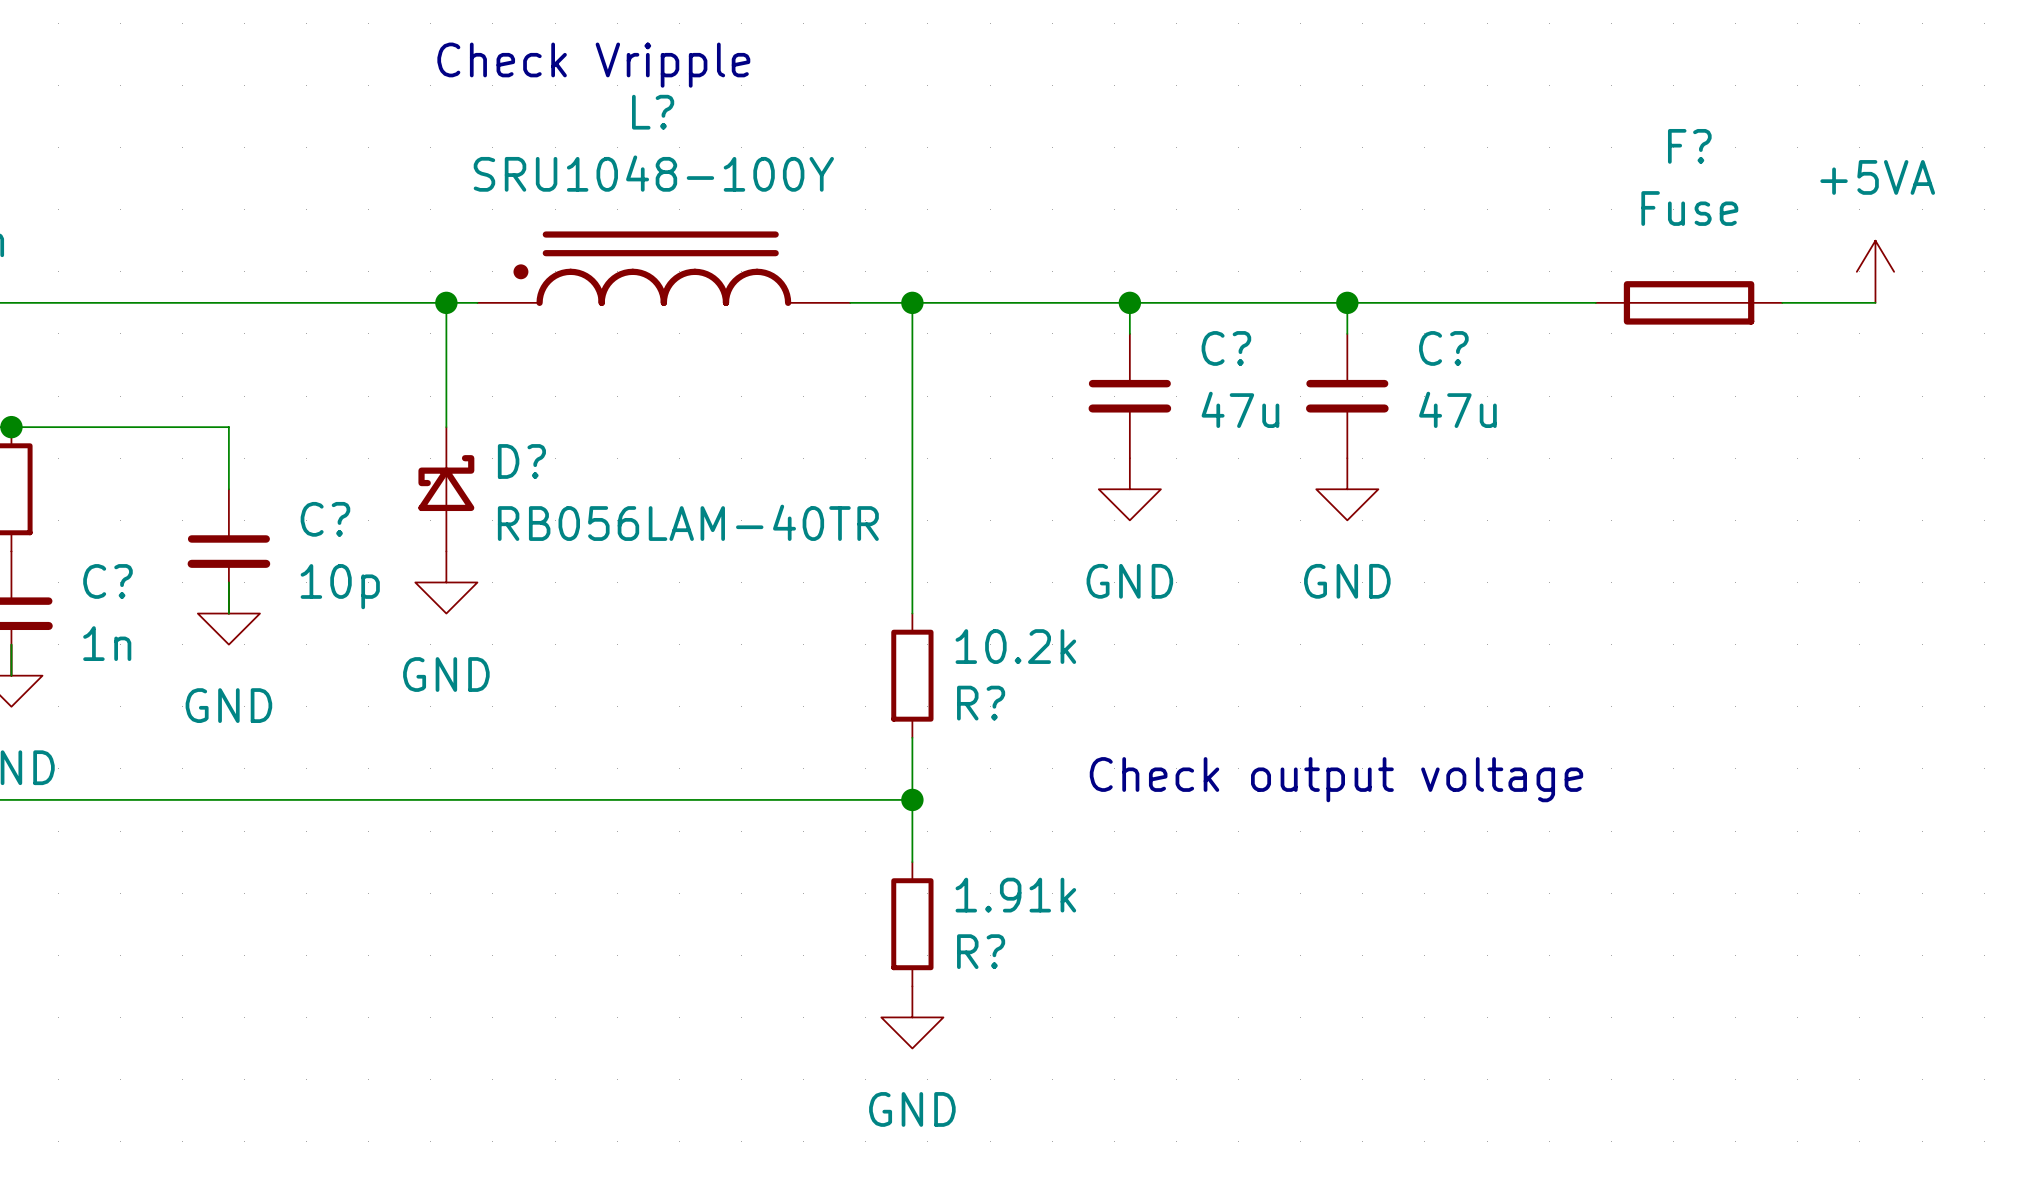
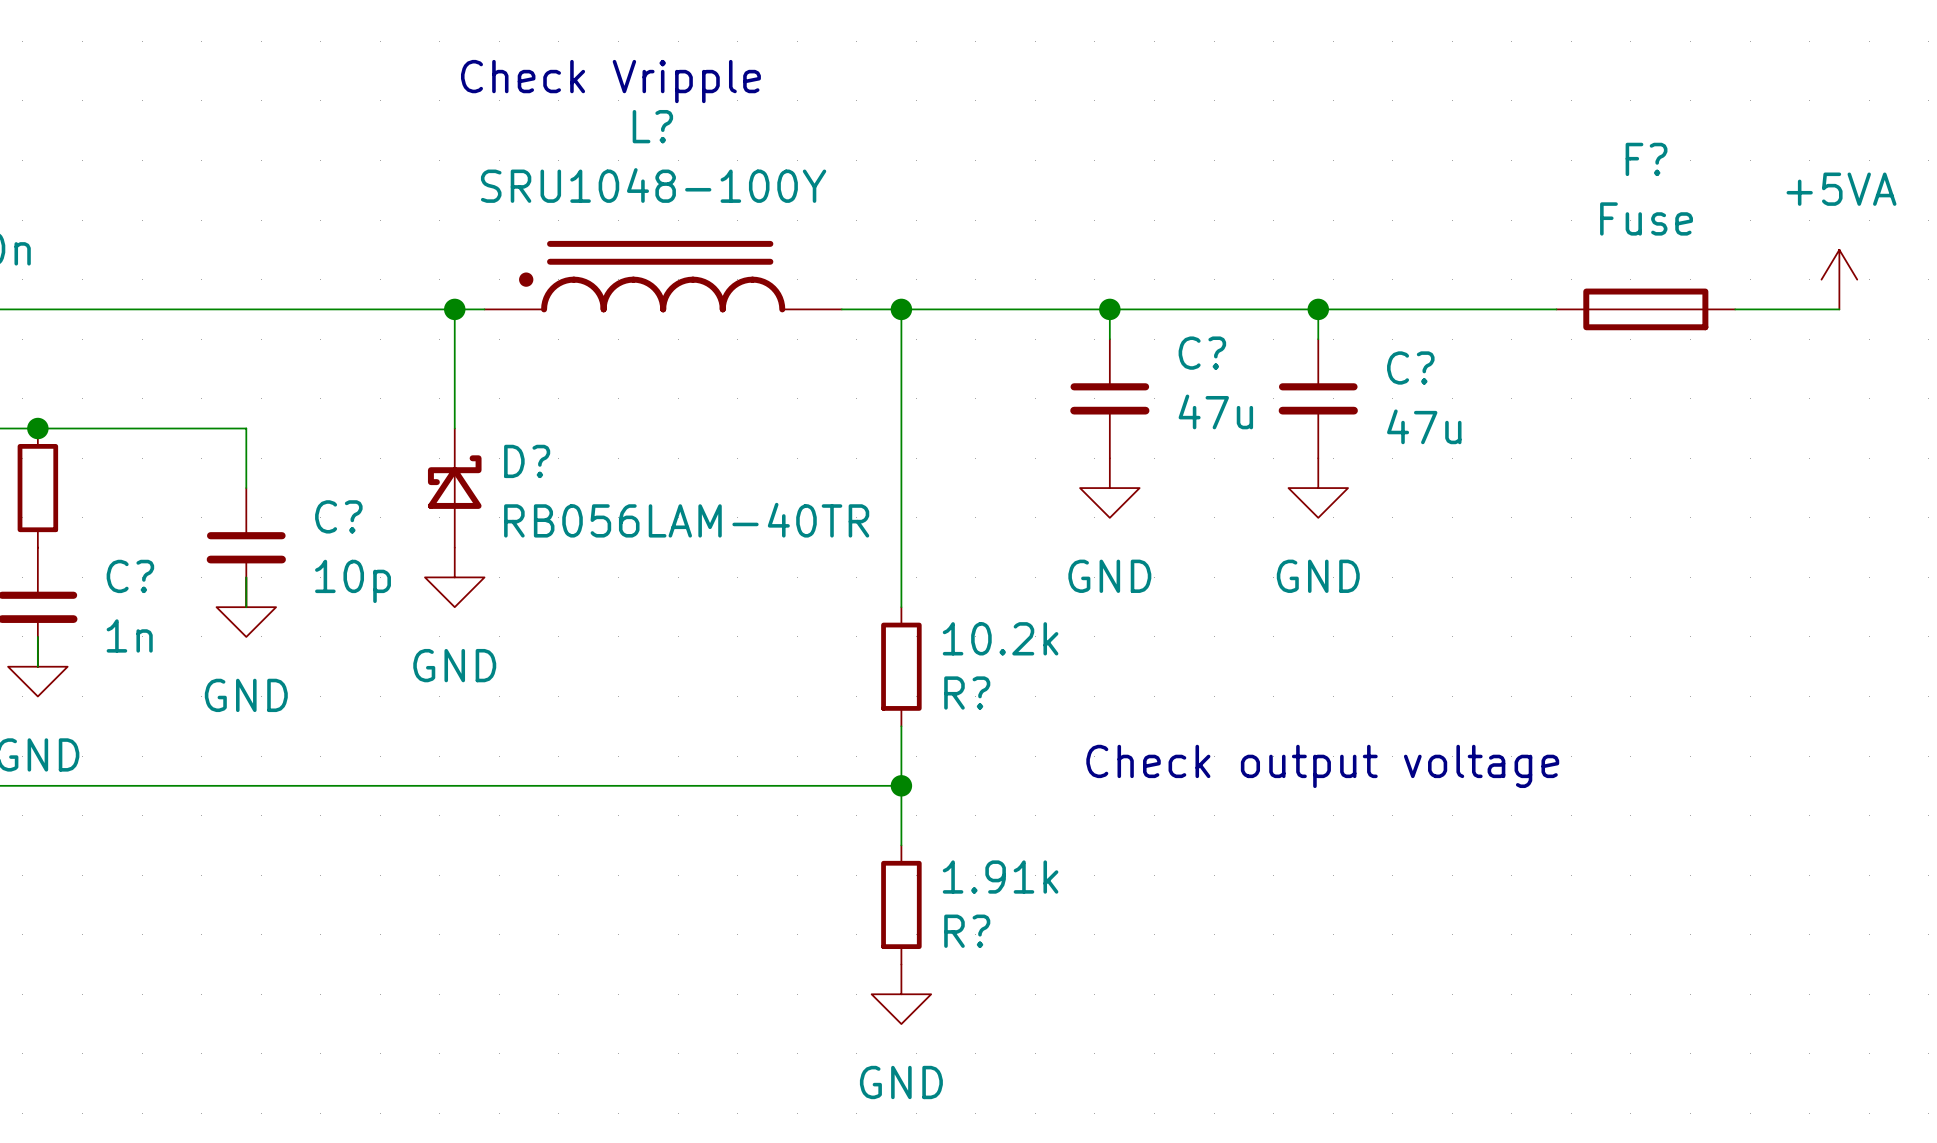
text position: Check Vripple (593, 65) -> Check Vripple (610, 81)
power symbol position: +5VA (1875, 271) -> +5VA (1839, 279)
wire: none -> (1824, 309) (1839, 309)
C? name position: C? (1443, 348) -> C? (1410, 367)
C? value position: 47u (1457, 409) -> 47u (1424, 426)
text position: Check output voltage (1336, 779) -> Check output voltage (1322, 766)

